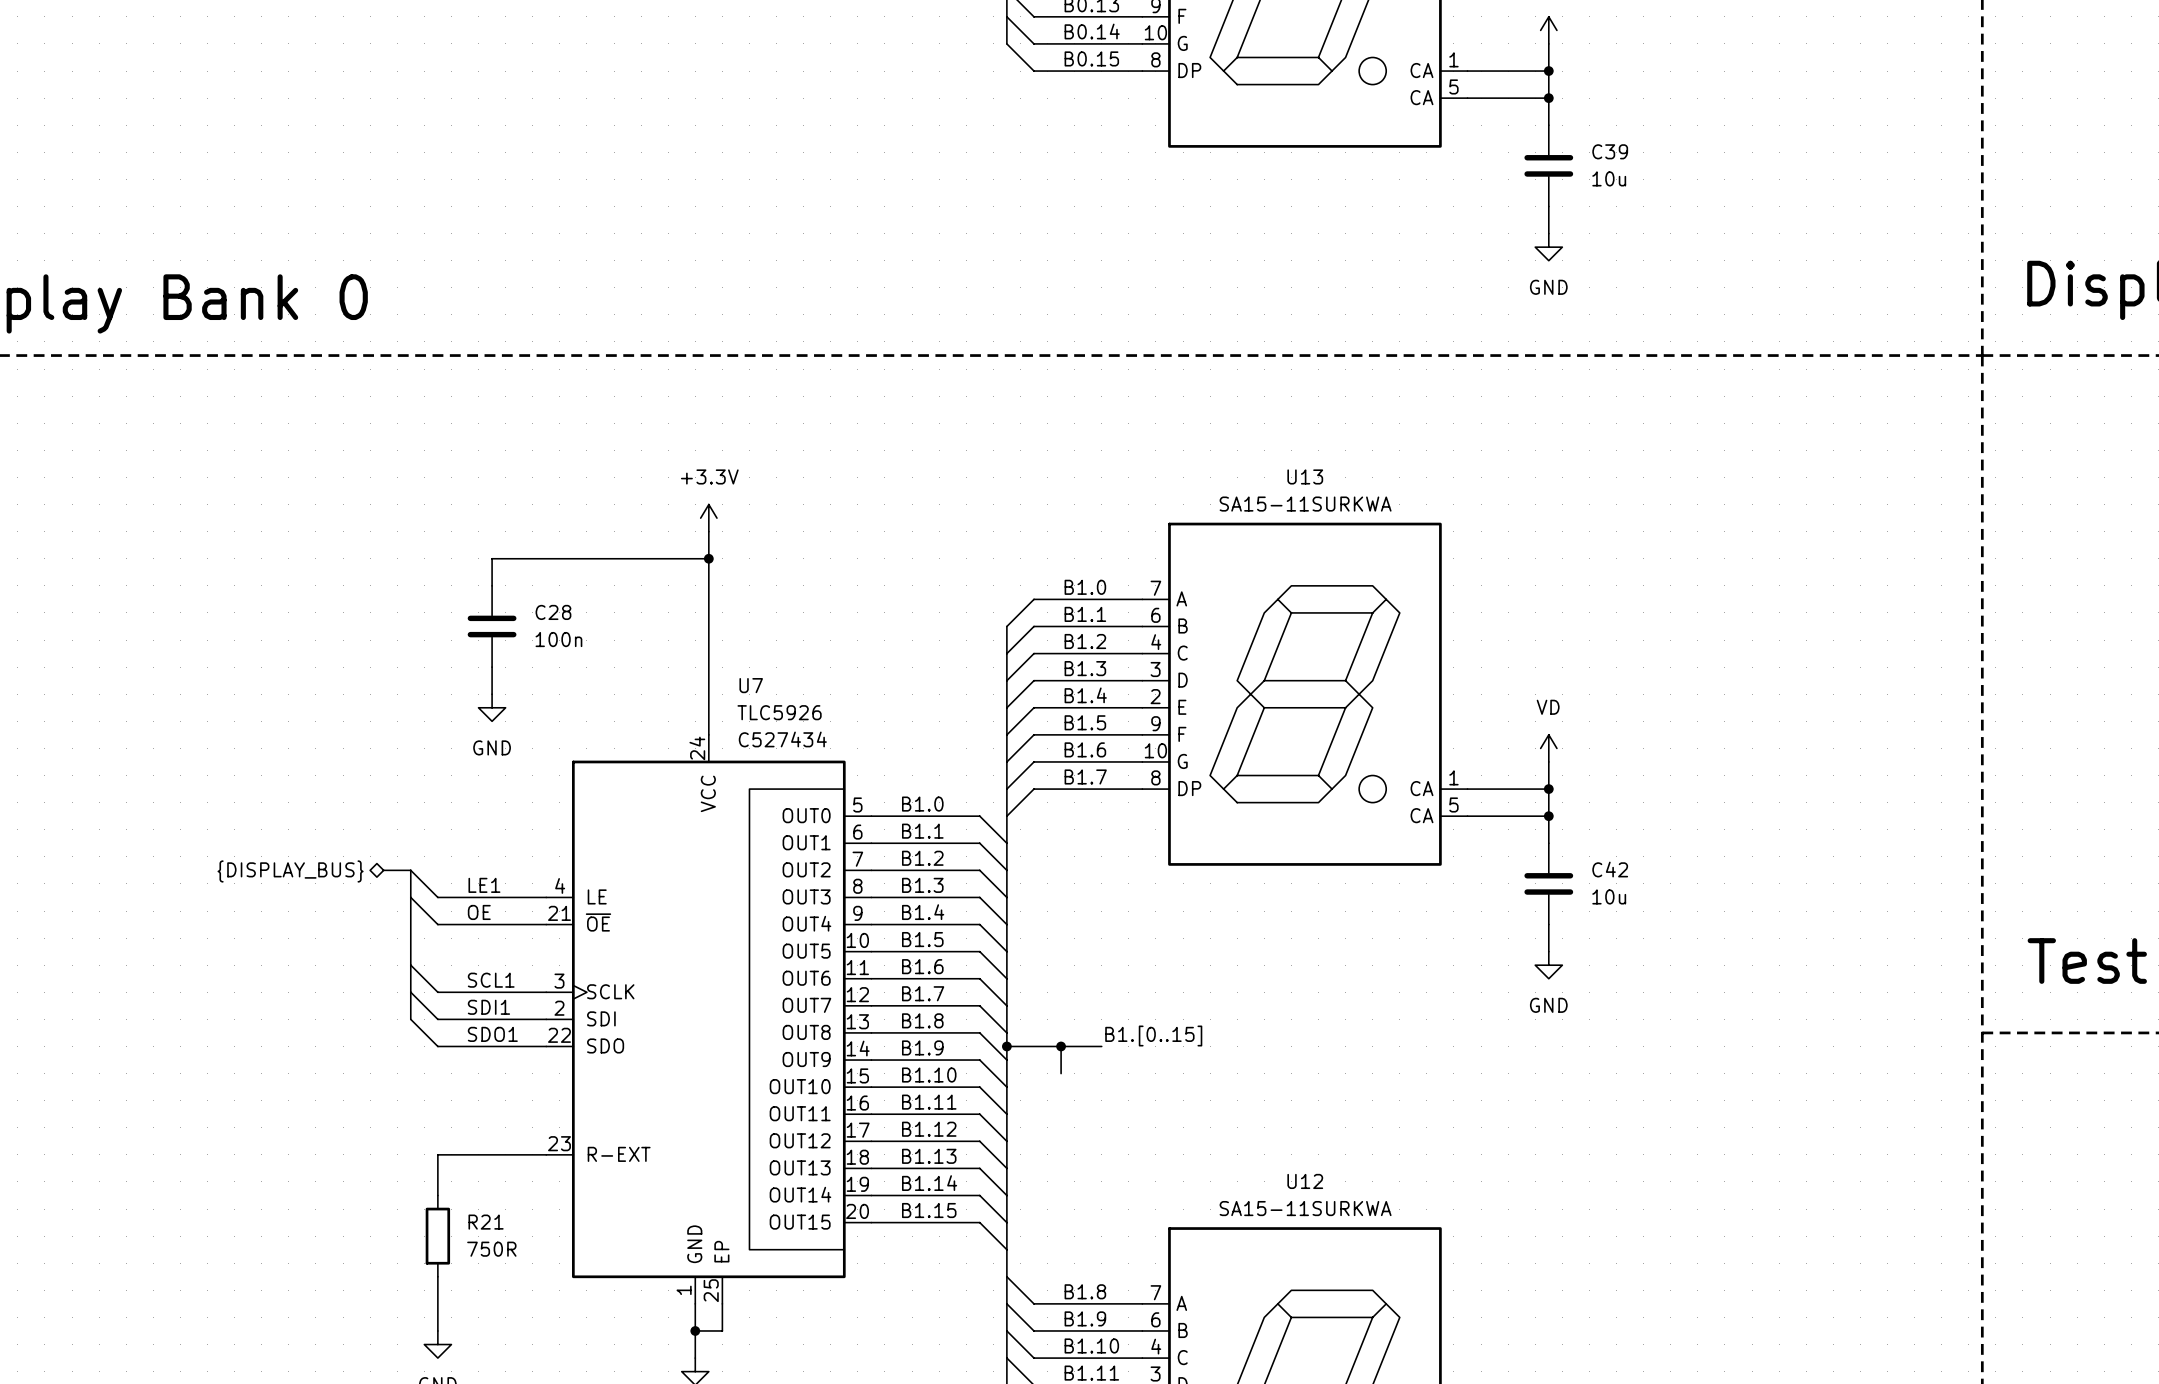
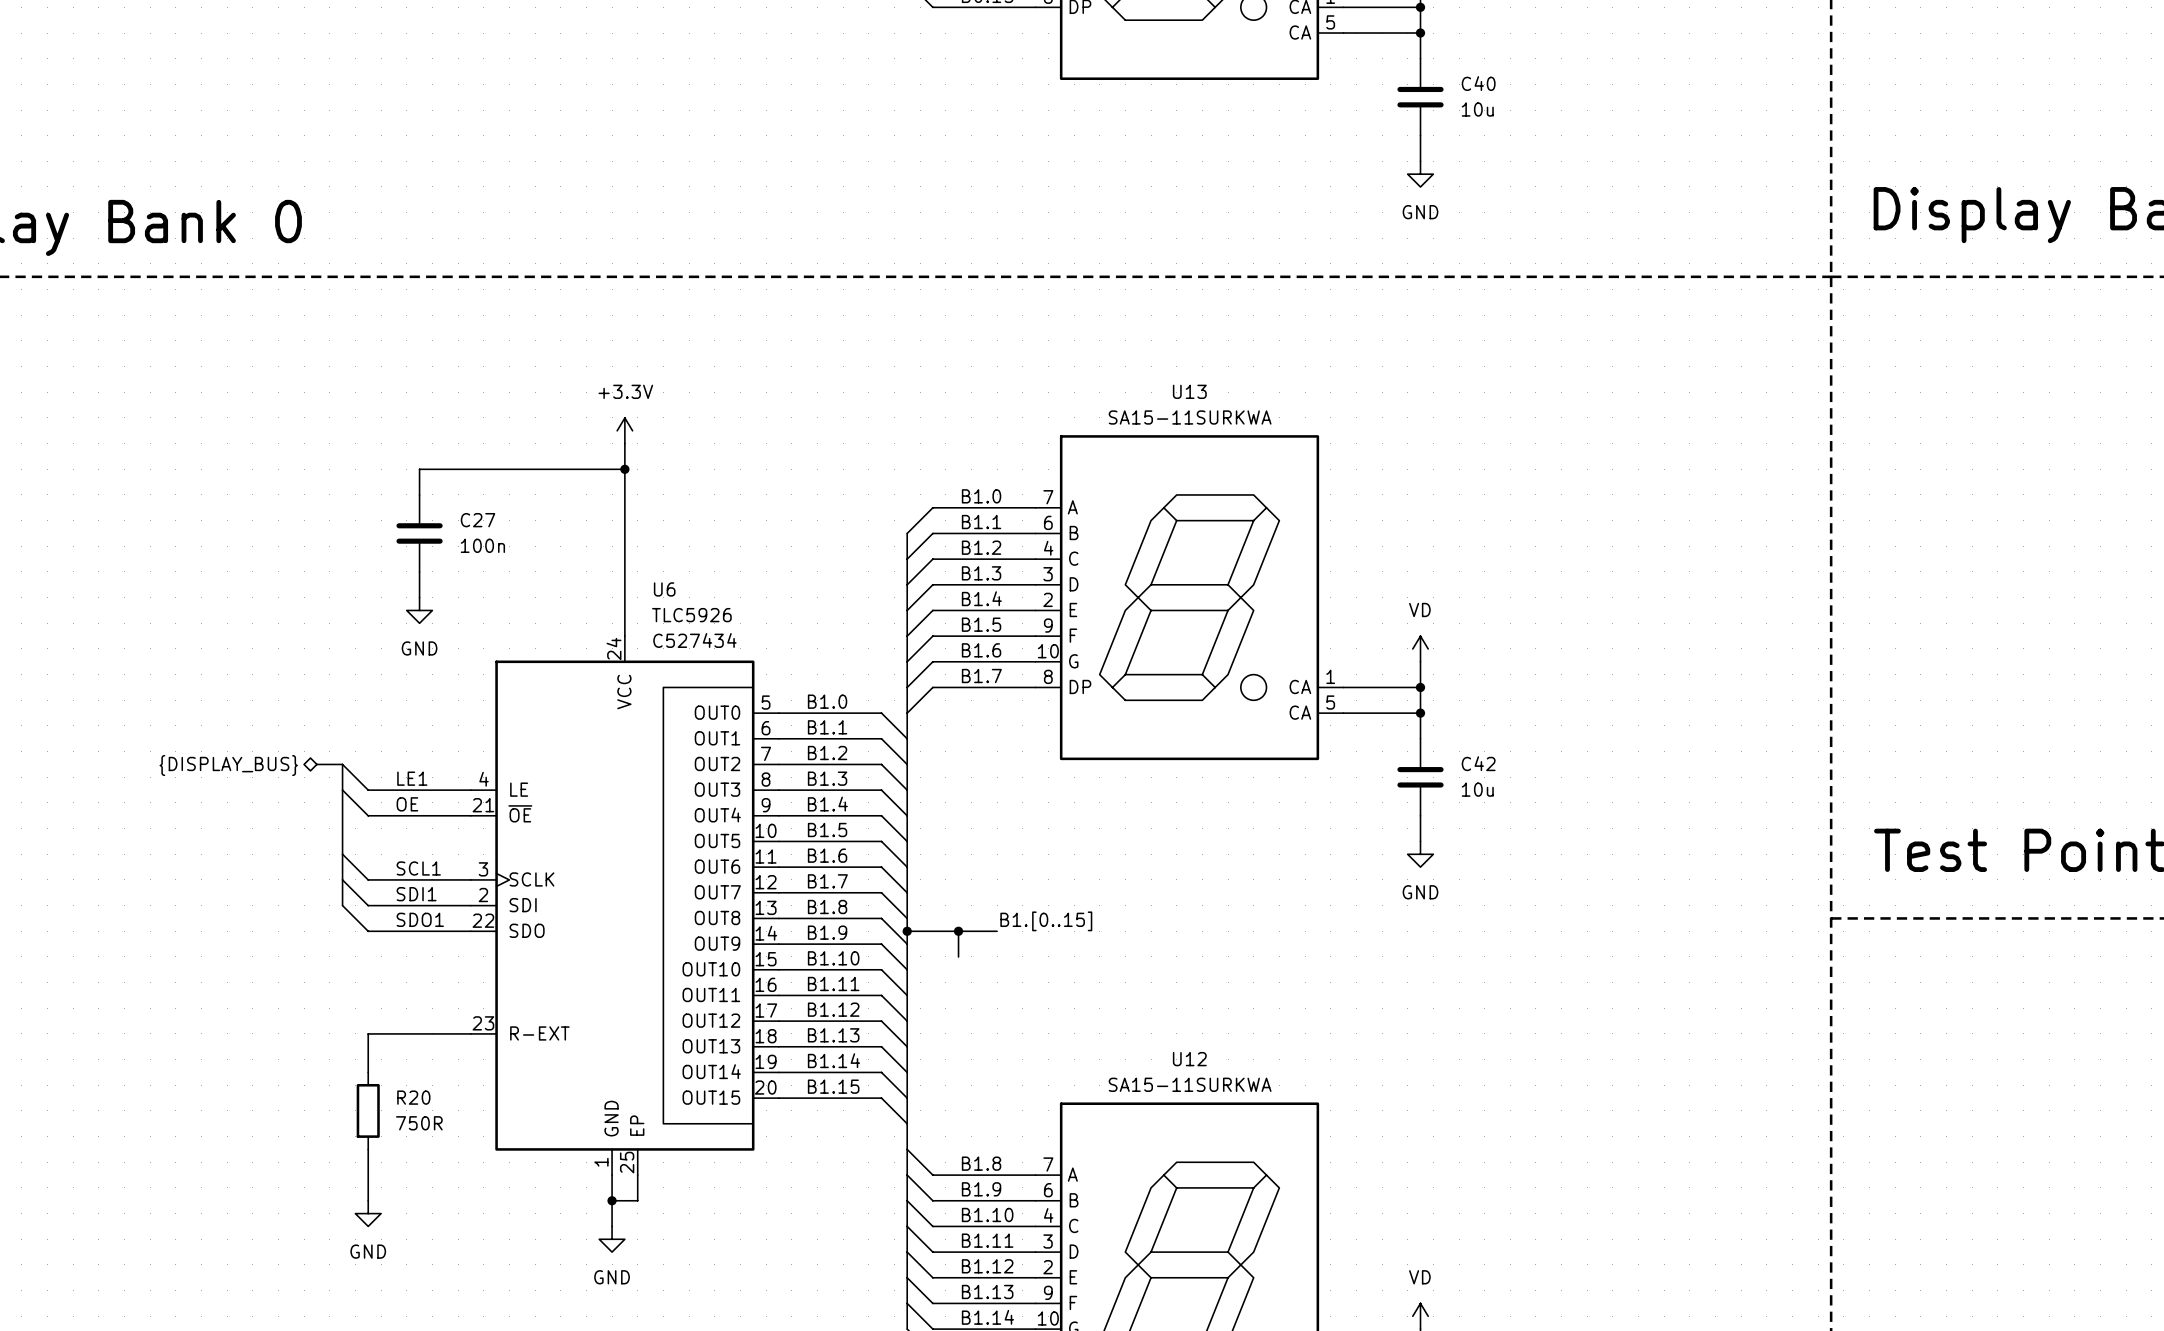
C39 name: C39 (1610, 151) -> C40 (1478, 83)
C28 name: C28 (553, 612) -> C27 (478, 520)
U7 name: U7 (751, 685) -> U6 (664, 589)
R21 name: R21 (486, 1222) -> R20 (413, 1097)

